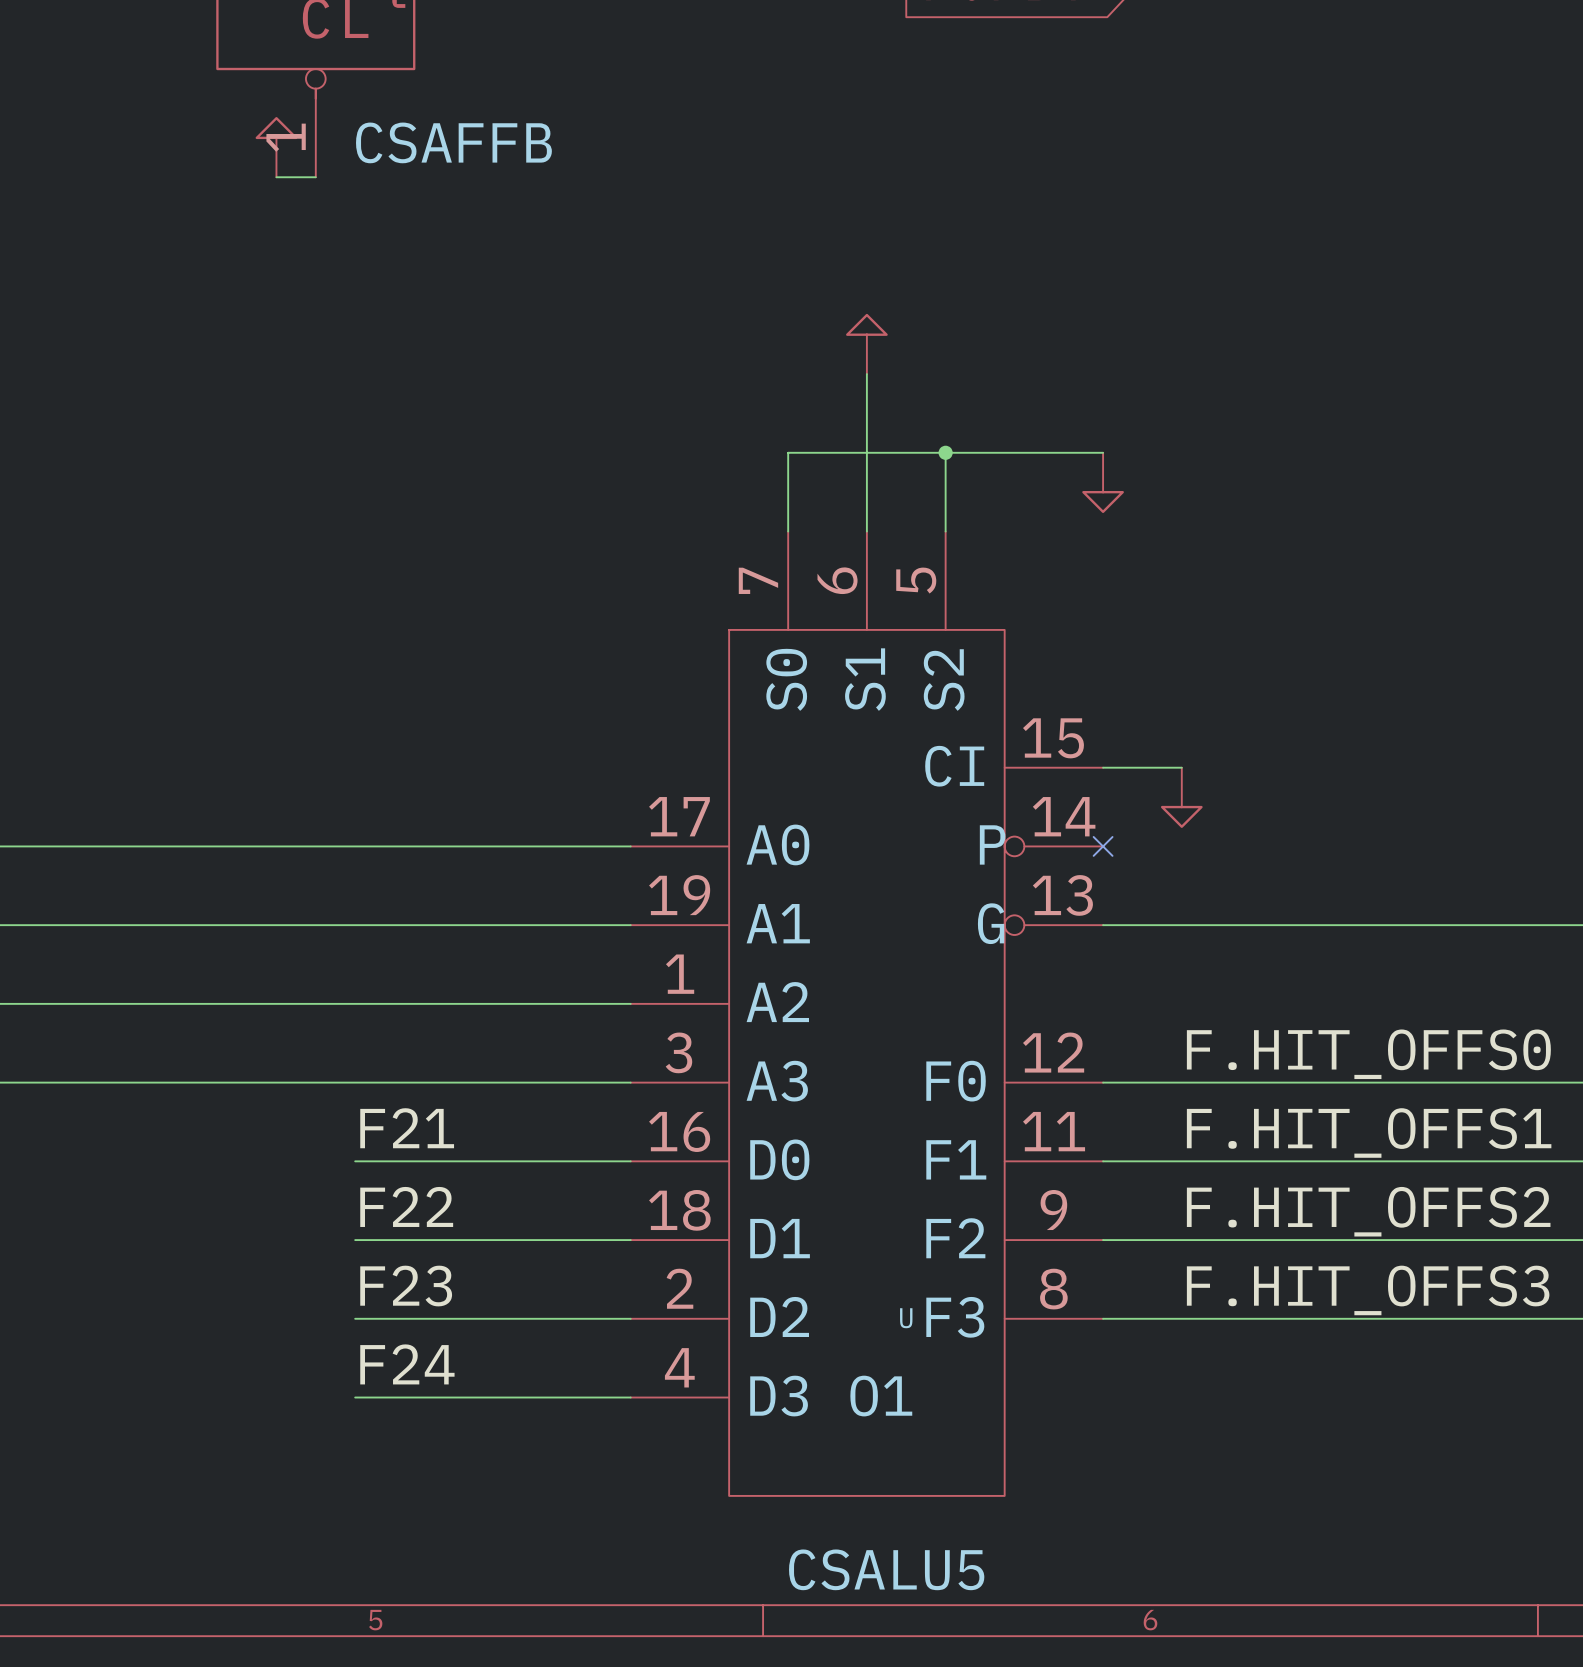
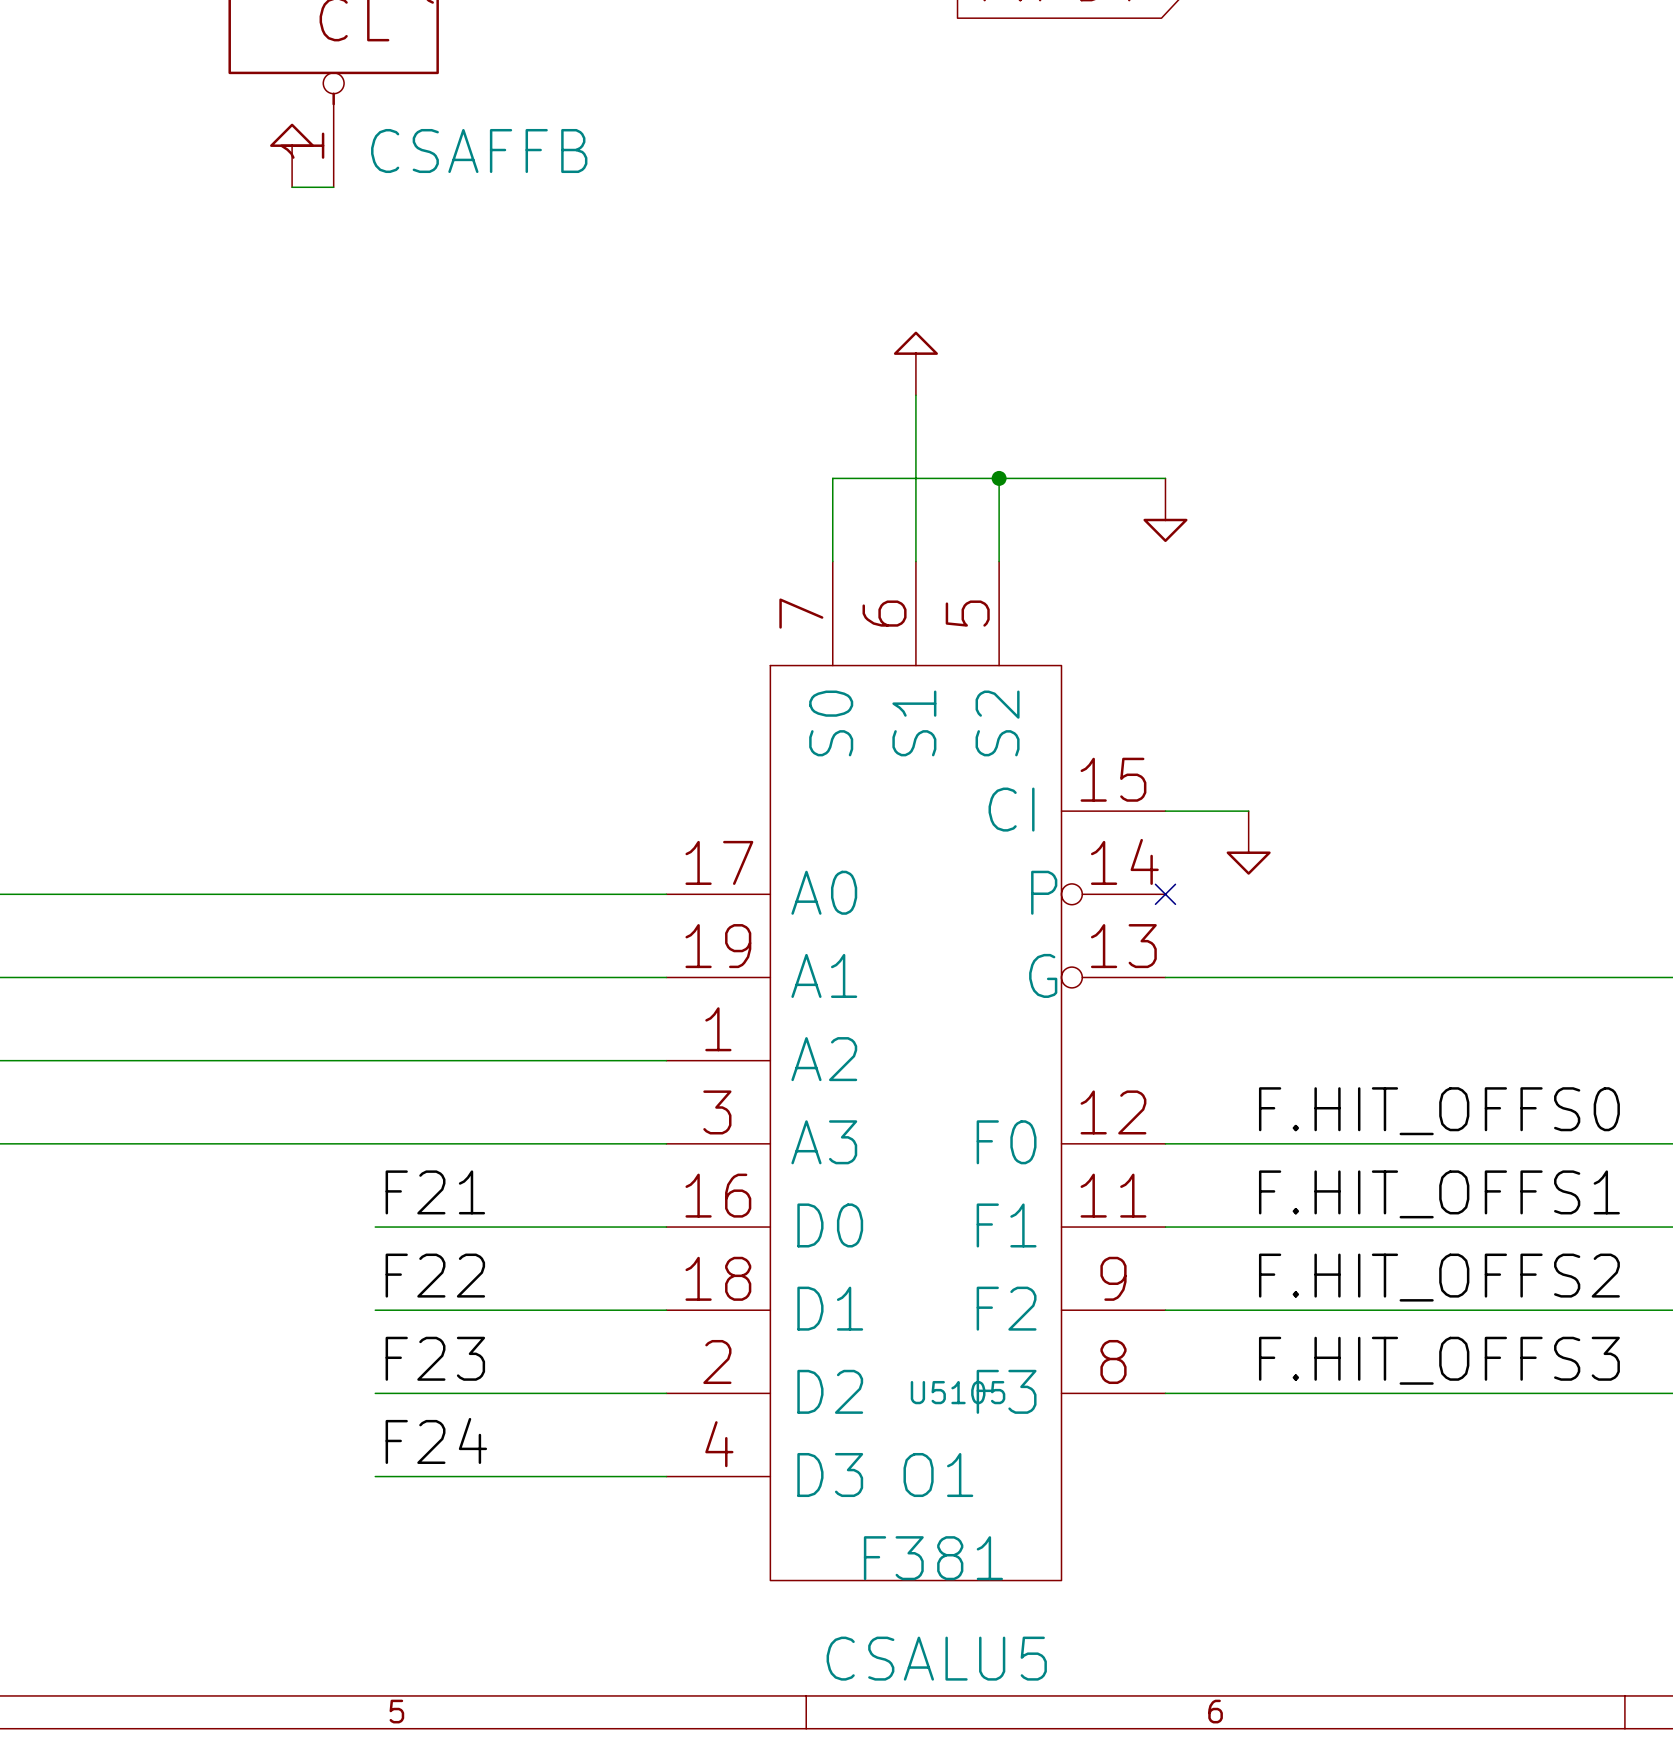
U name: U (906, 1318) -> U5105 (958, 1392)
U value: none -> F381 (933, 1558)

